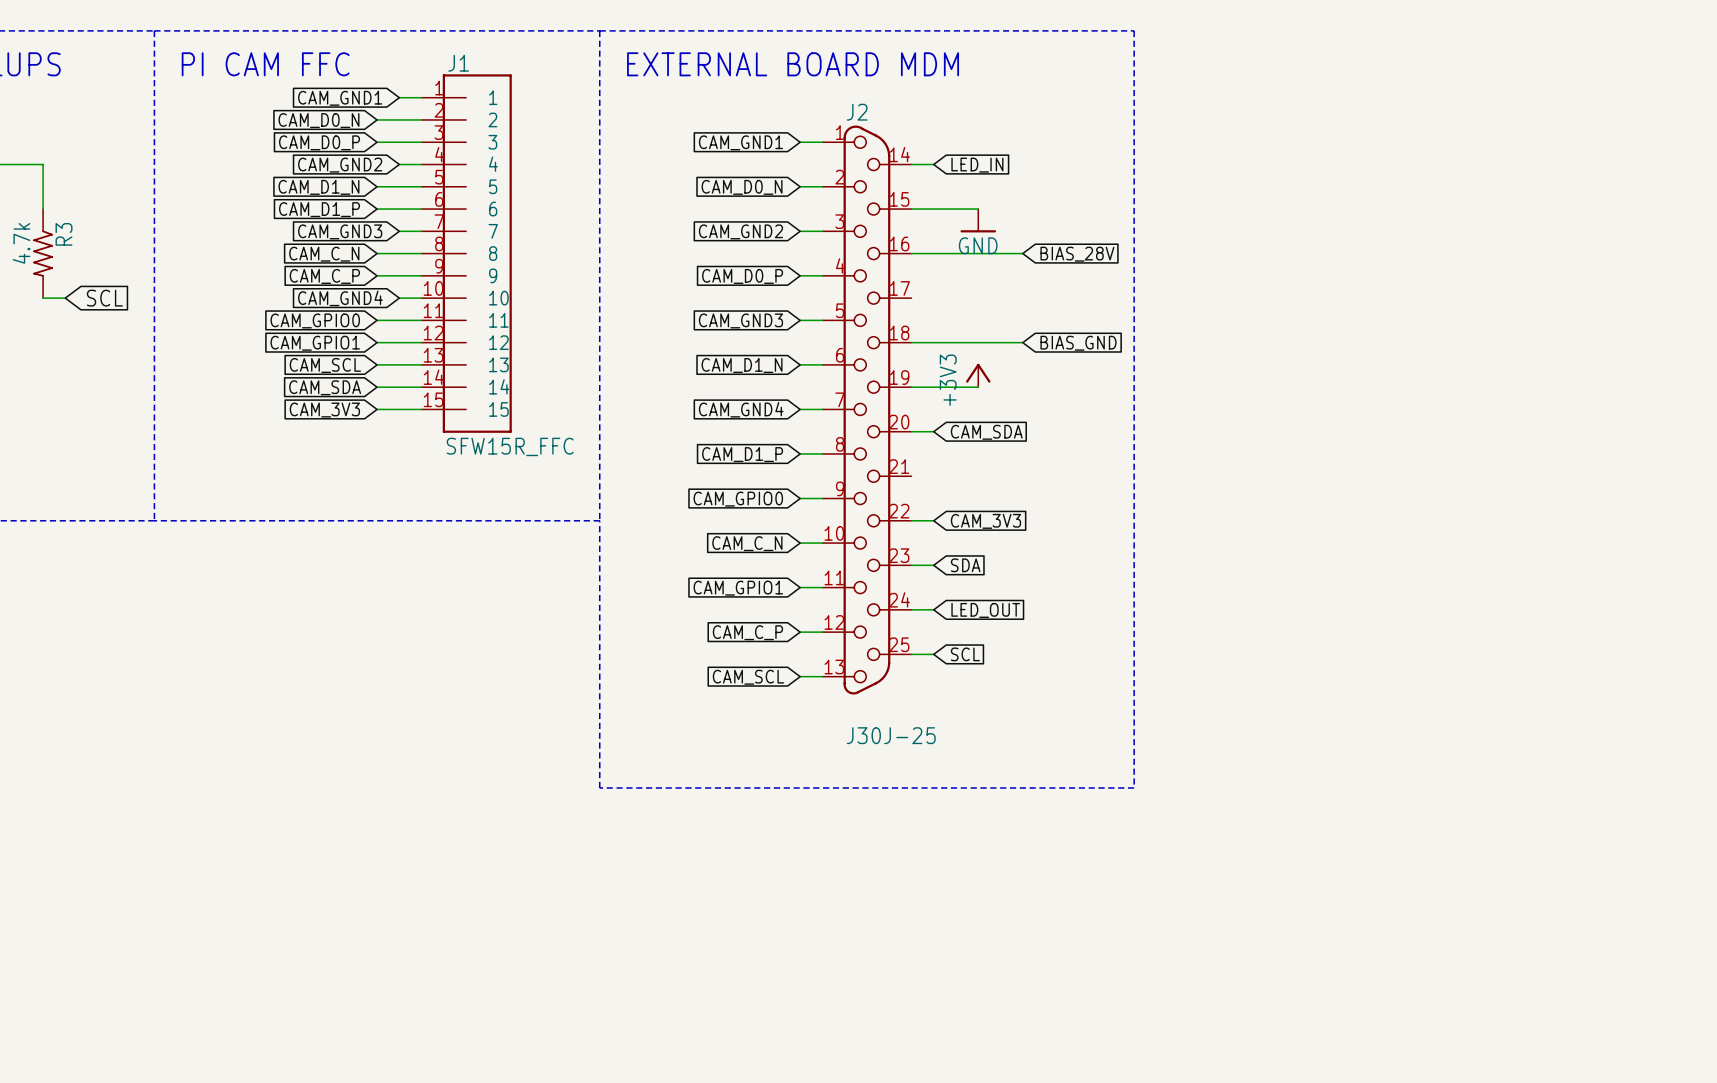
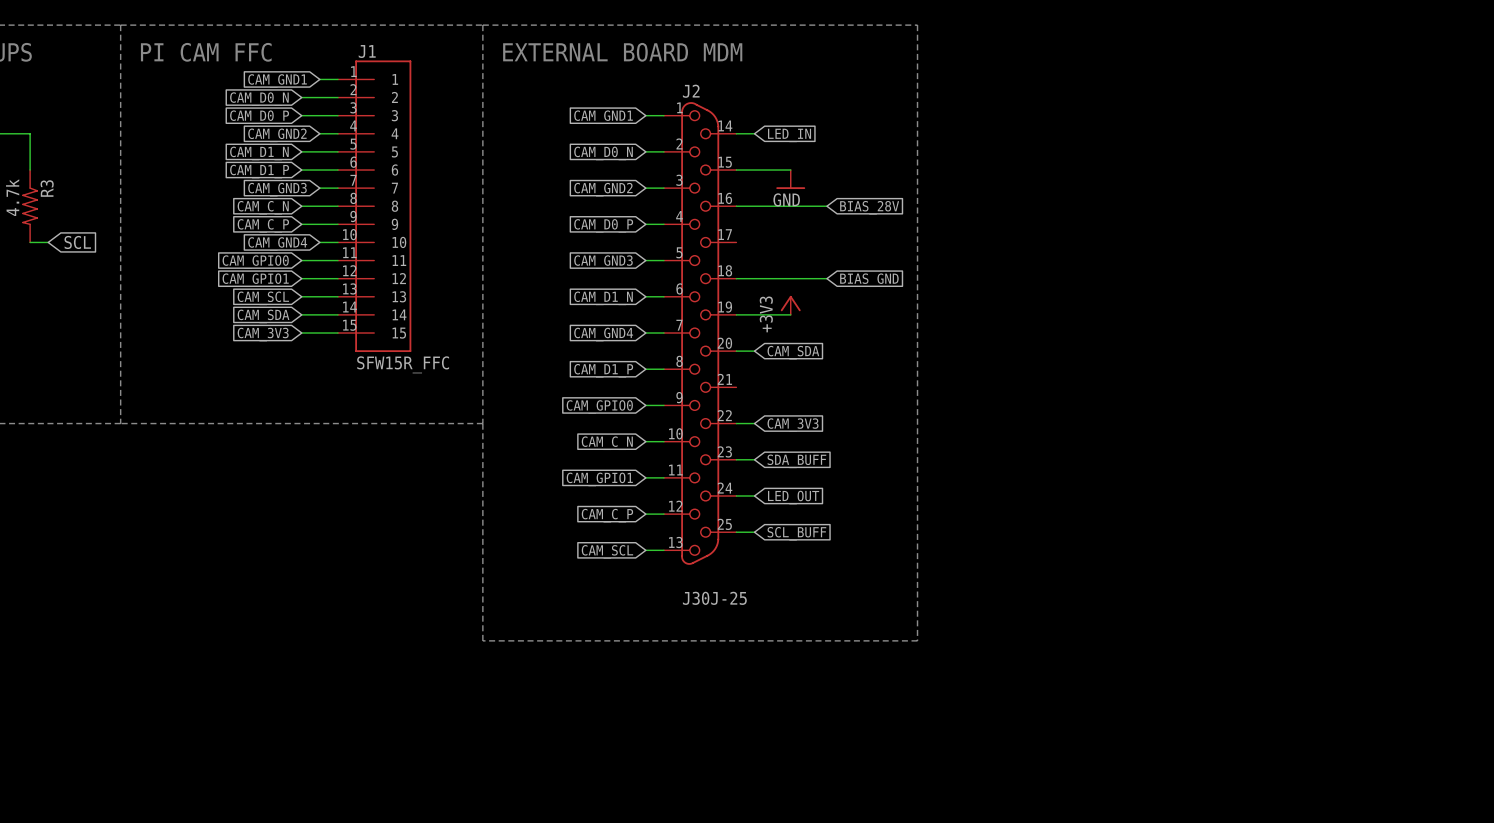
global label: SDA (965, 565) -> SDA_BUFF (796, 461)
global label: SCL (965, 654) -> SCL_BUFF (796, 533)

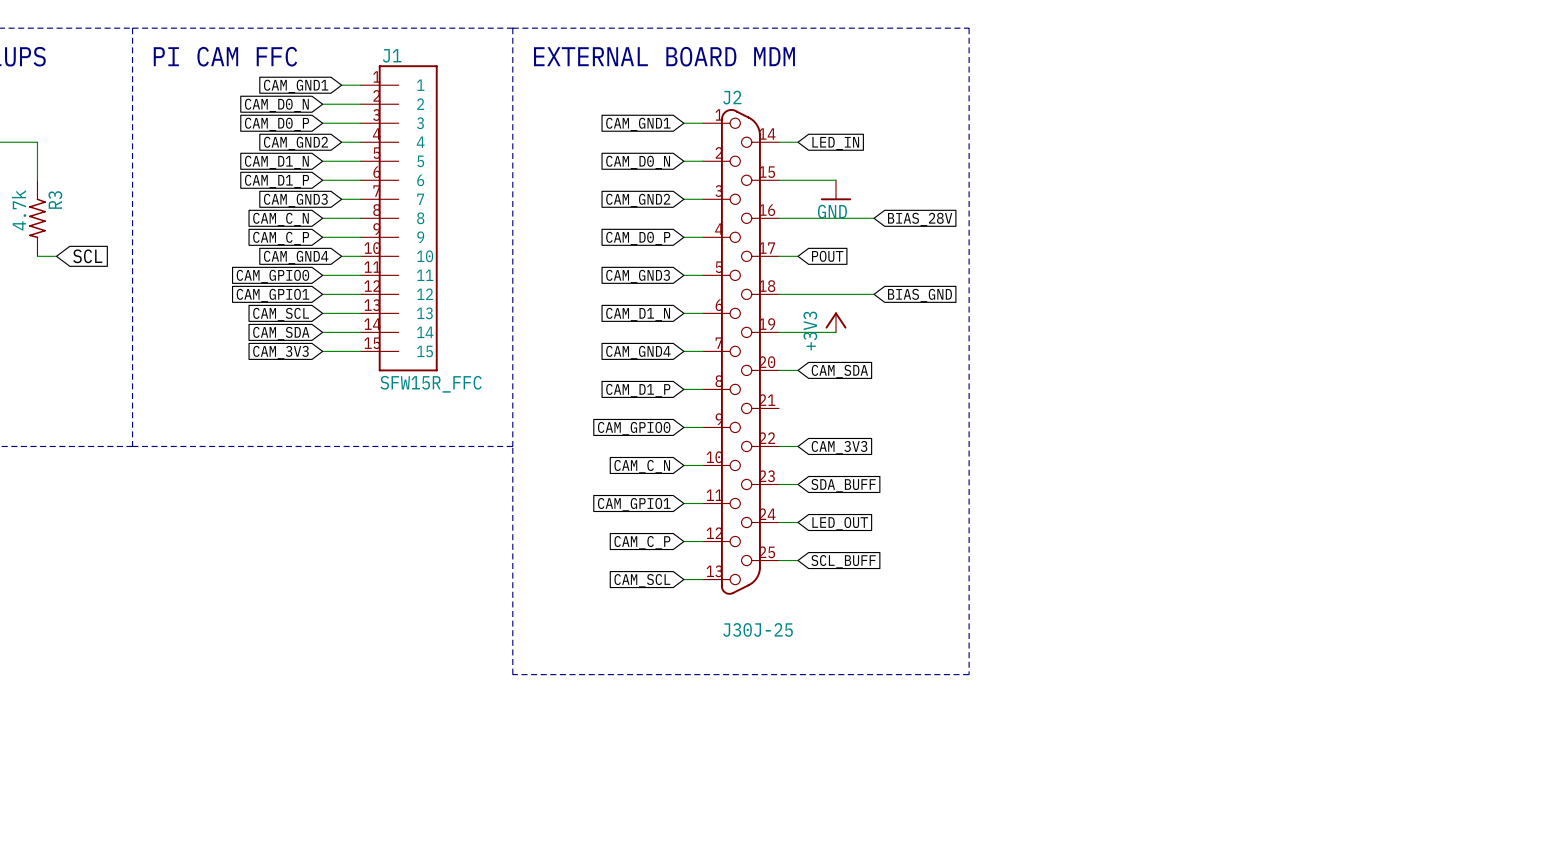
wire: none -> (778, 256) (797, 256)
global label: none -> POUT (827, 256)

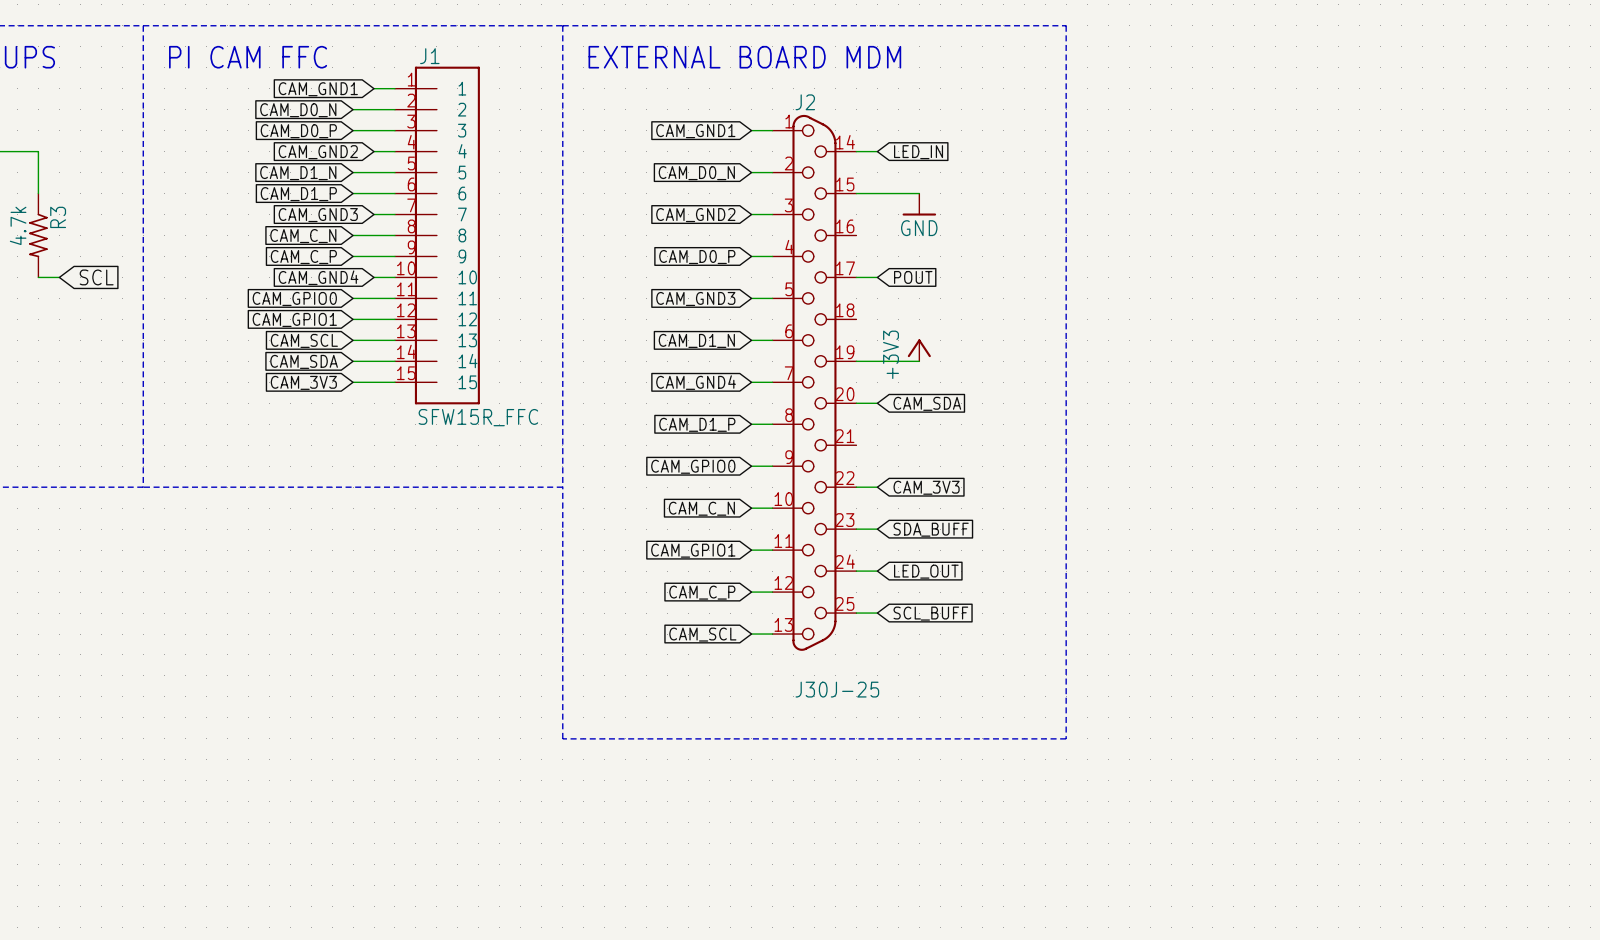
wire: (778, 218) (874, 218) -> none
global label: BIAS_28V (920, 219) -> none
wire: (778, 294) (874, 294) -> none
global label: BIAS_GND (919, 295) -> none

